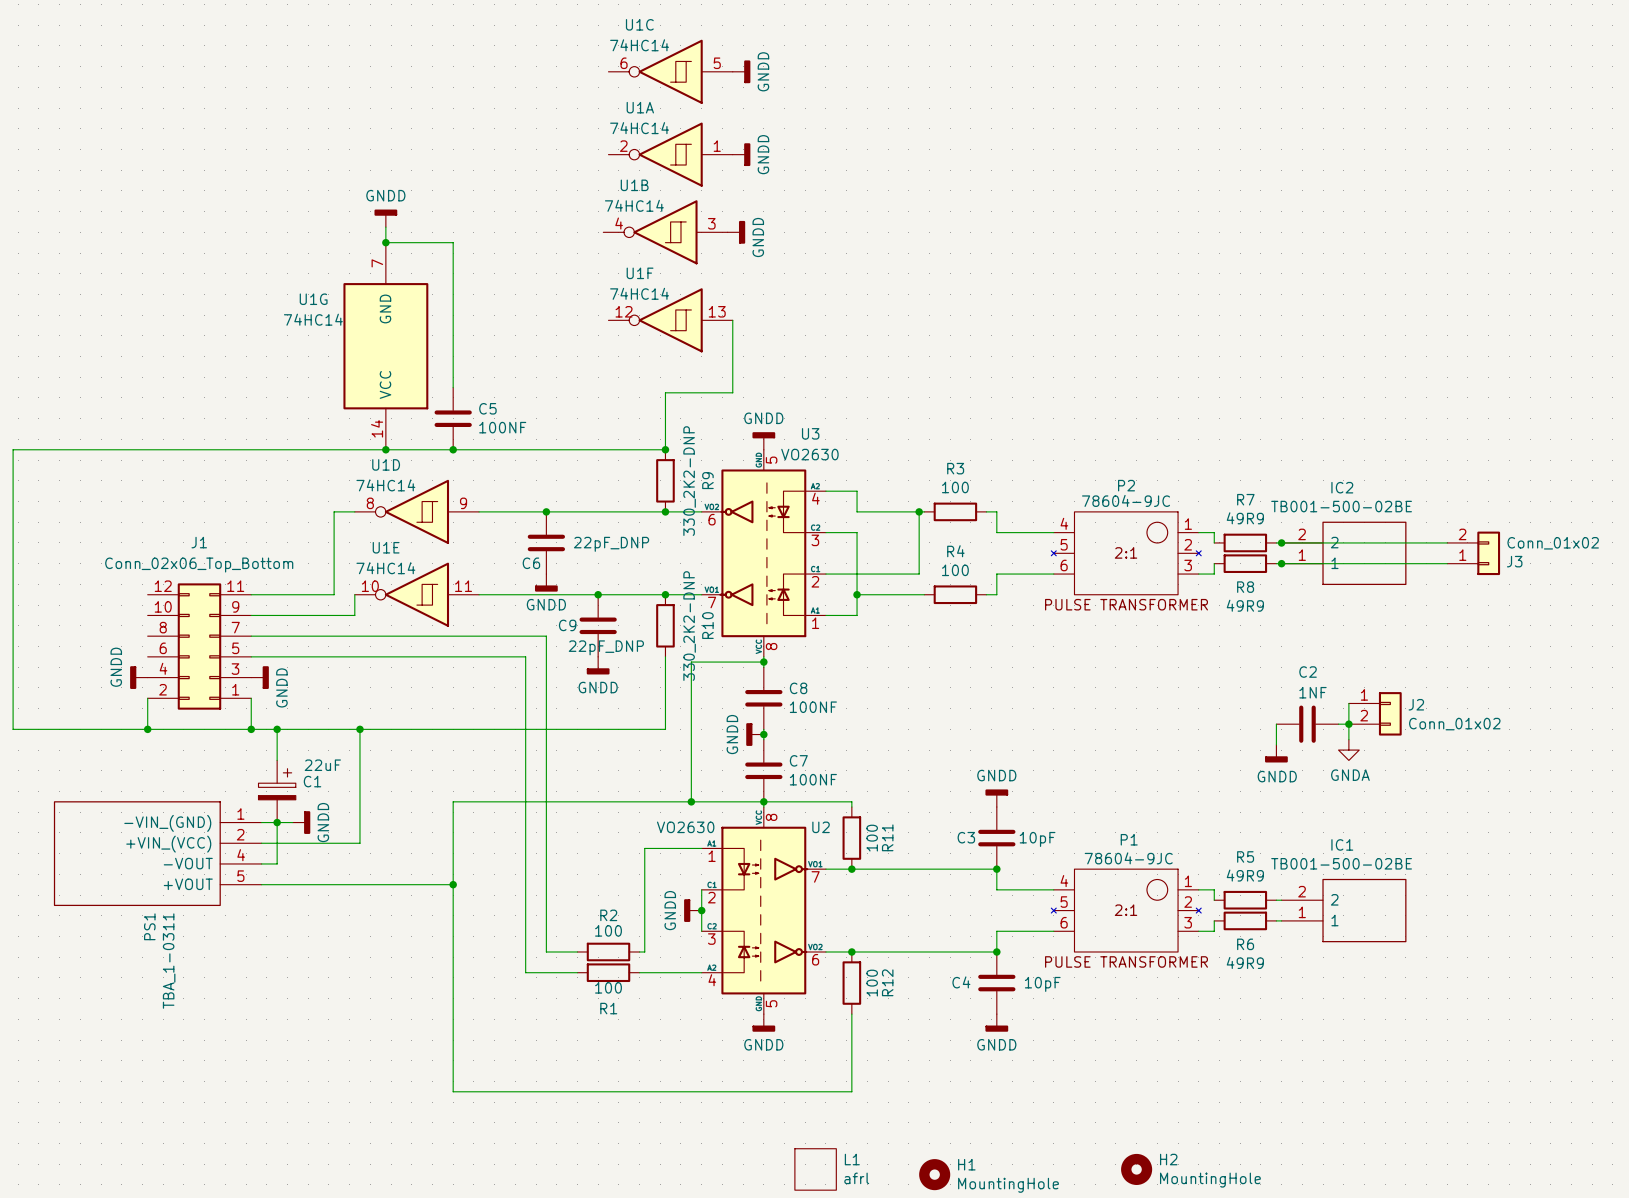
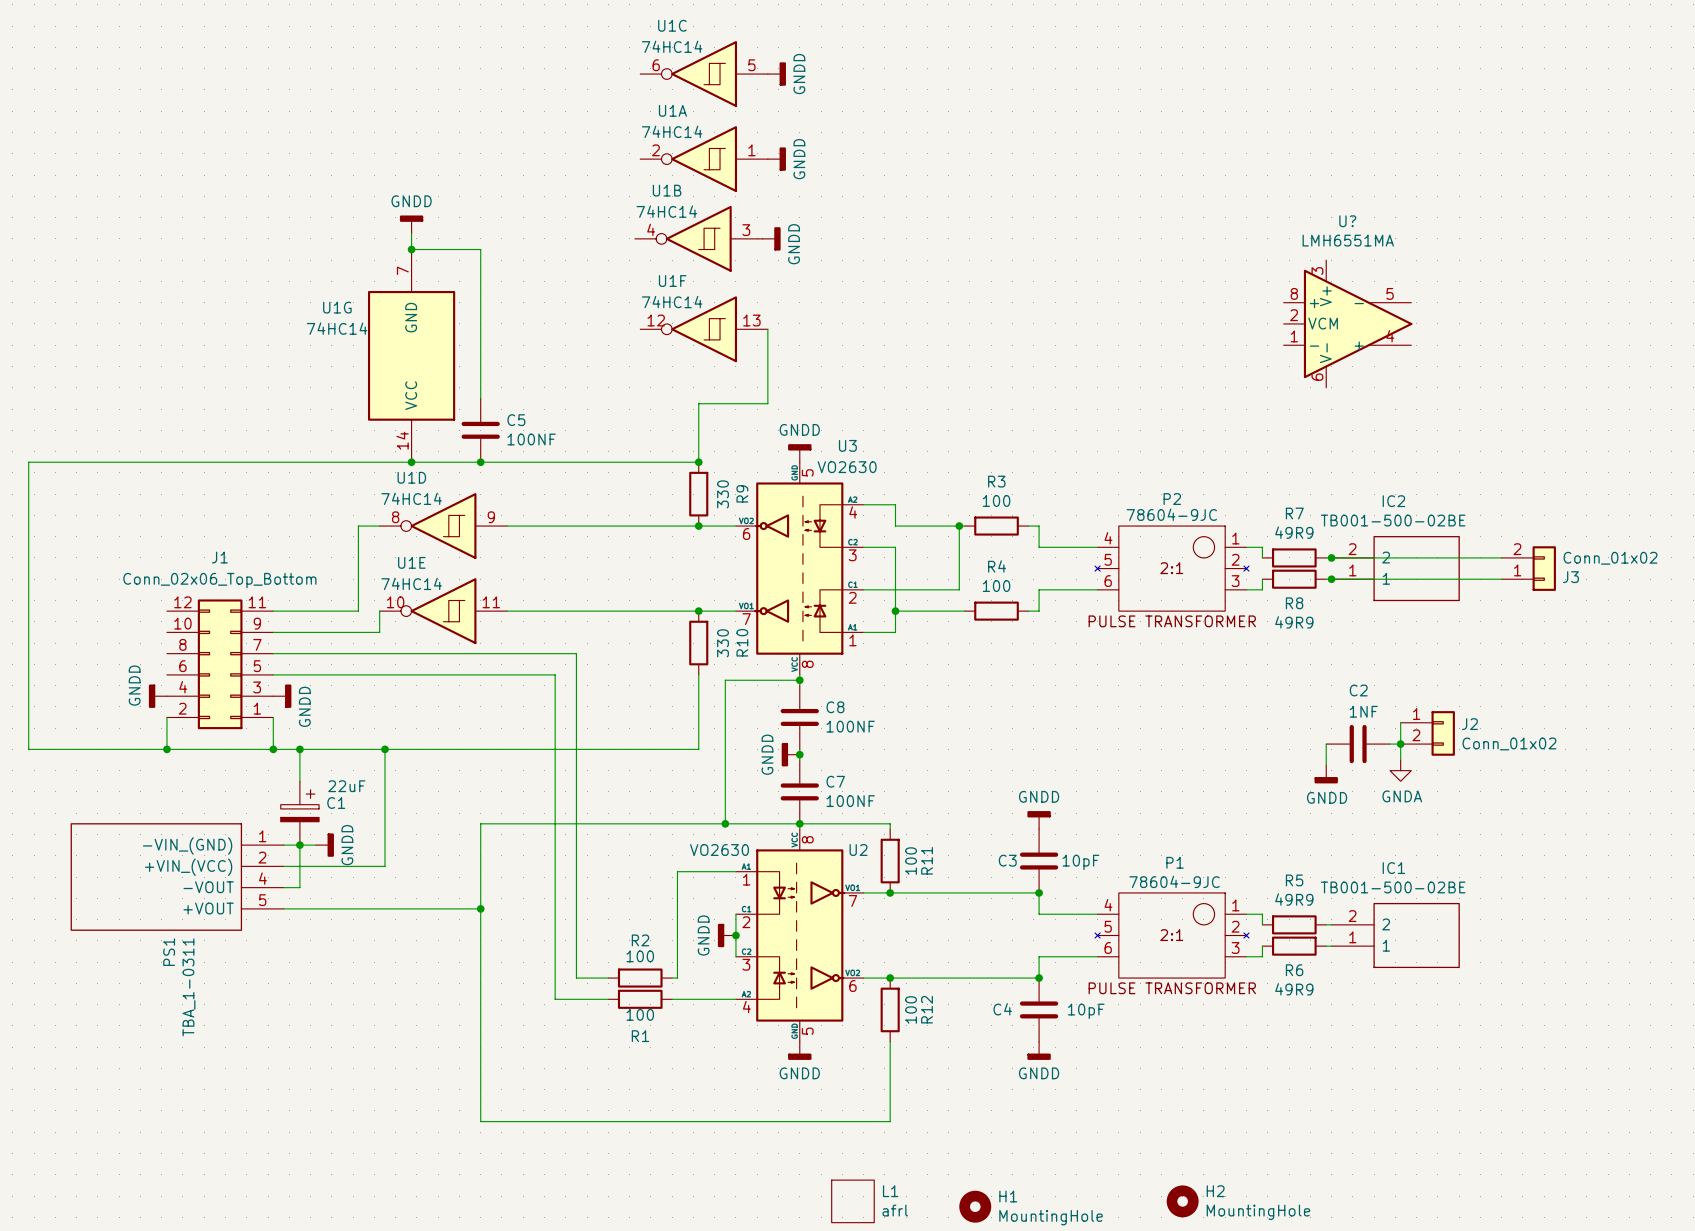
U?: none -> LMH6551MA (1348, 323)
R9 value: 330_2K2-DNP (689, 481) -> 330 (723, 494)
junction: (546, 511) -> none
C6: 22pF_DNP (546, 542) -> none
power symbol: GNDD (546, 582) -> none
junction: (598, 594) -> none
C9: 22pF_DNP (598, 625) -> none
R10 value: 330_2K2-DNP (689, 626) -> 330 (723, 643)
power symbol: GNDD (598, 665) -> none

